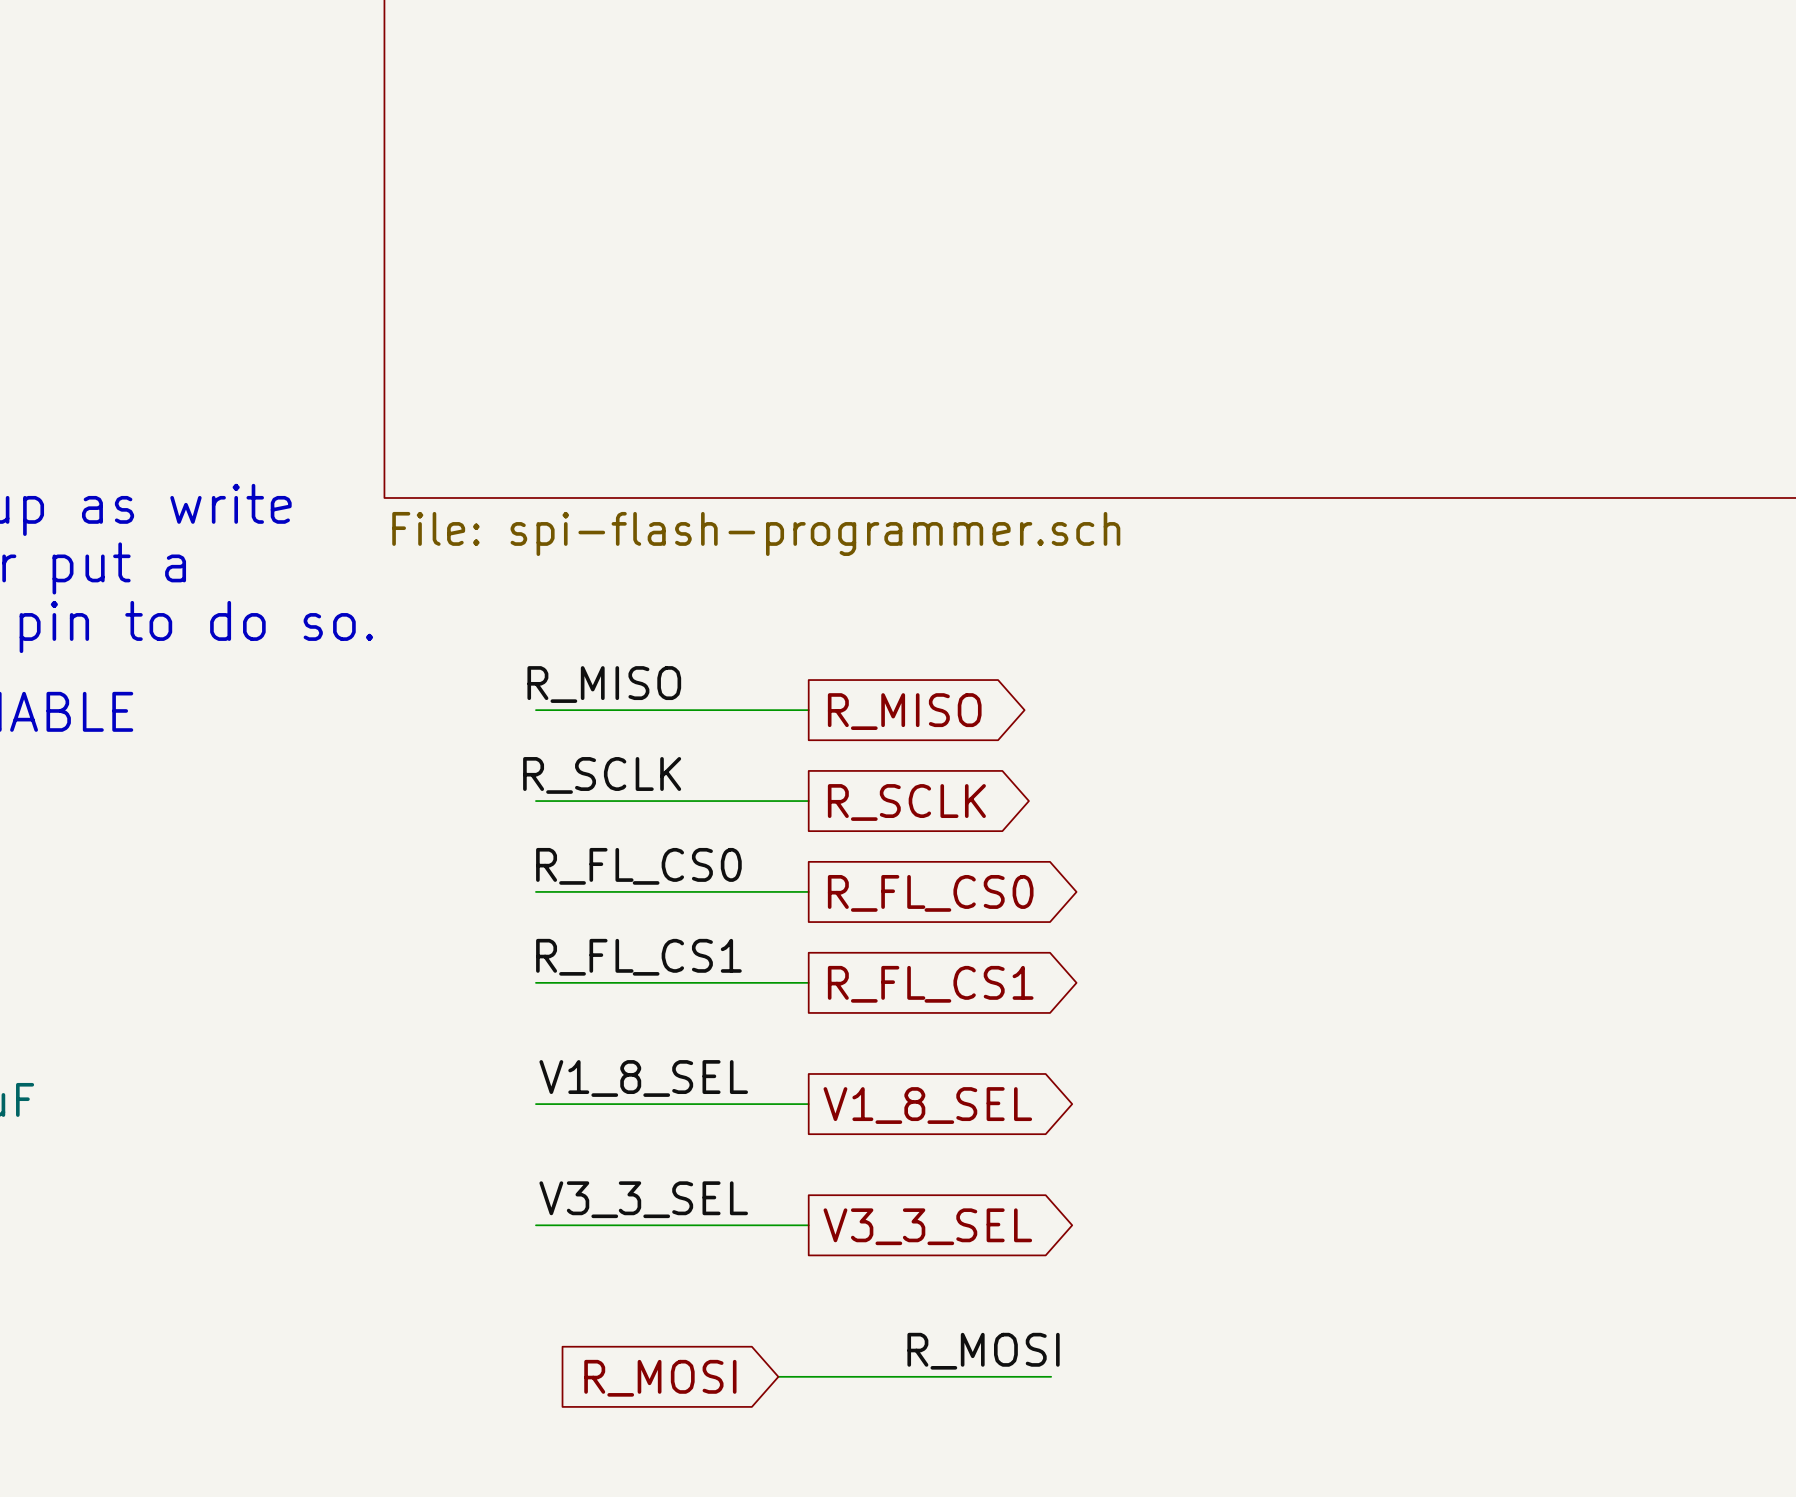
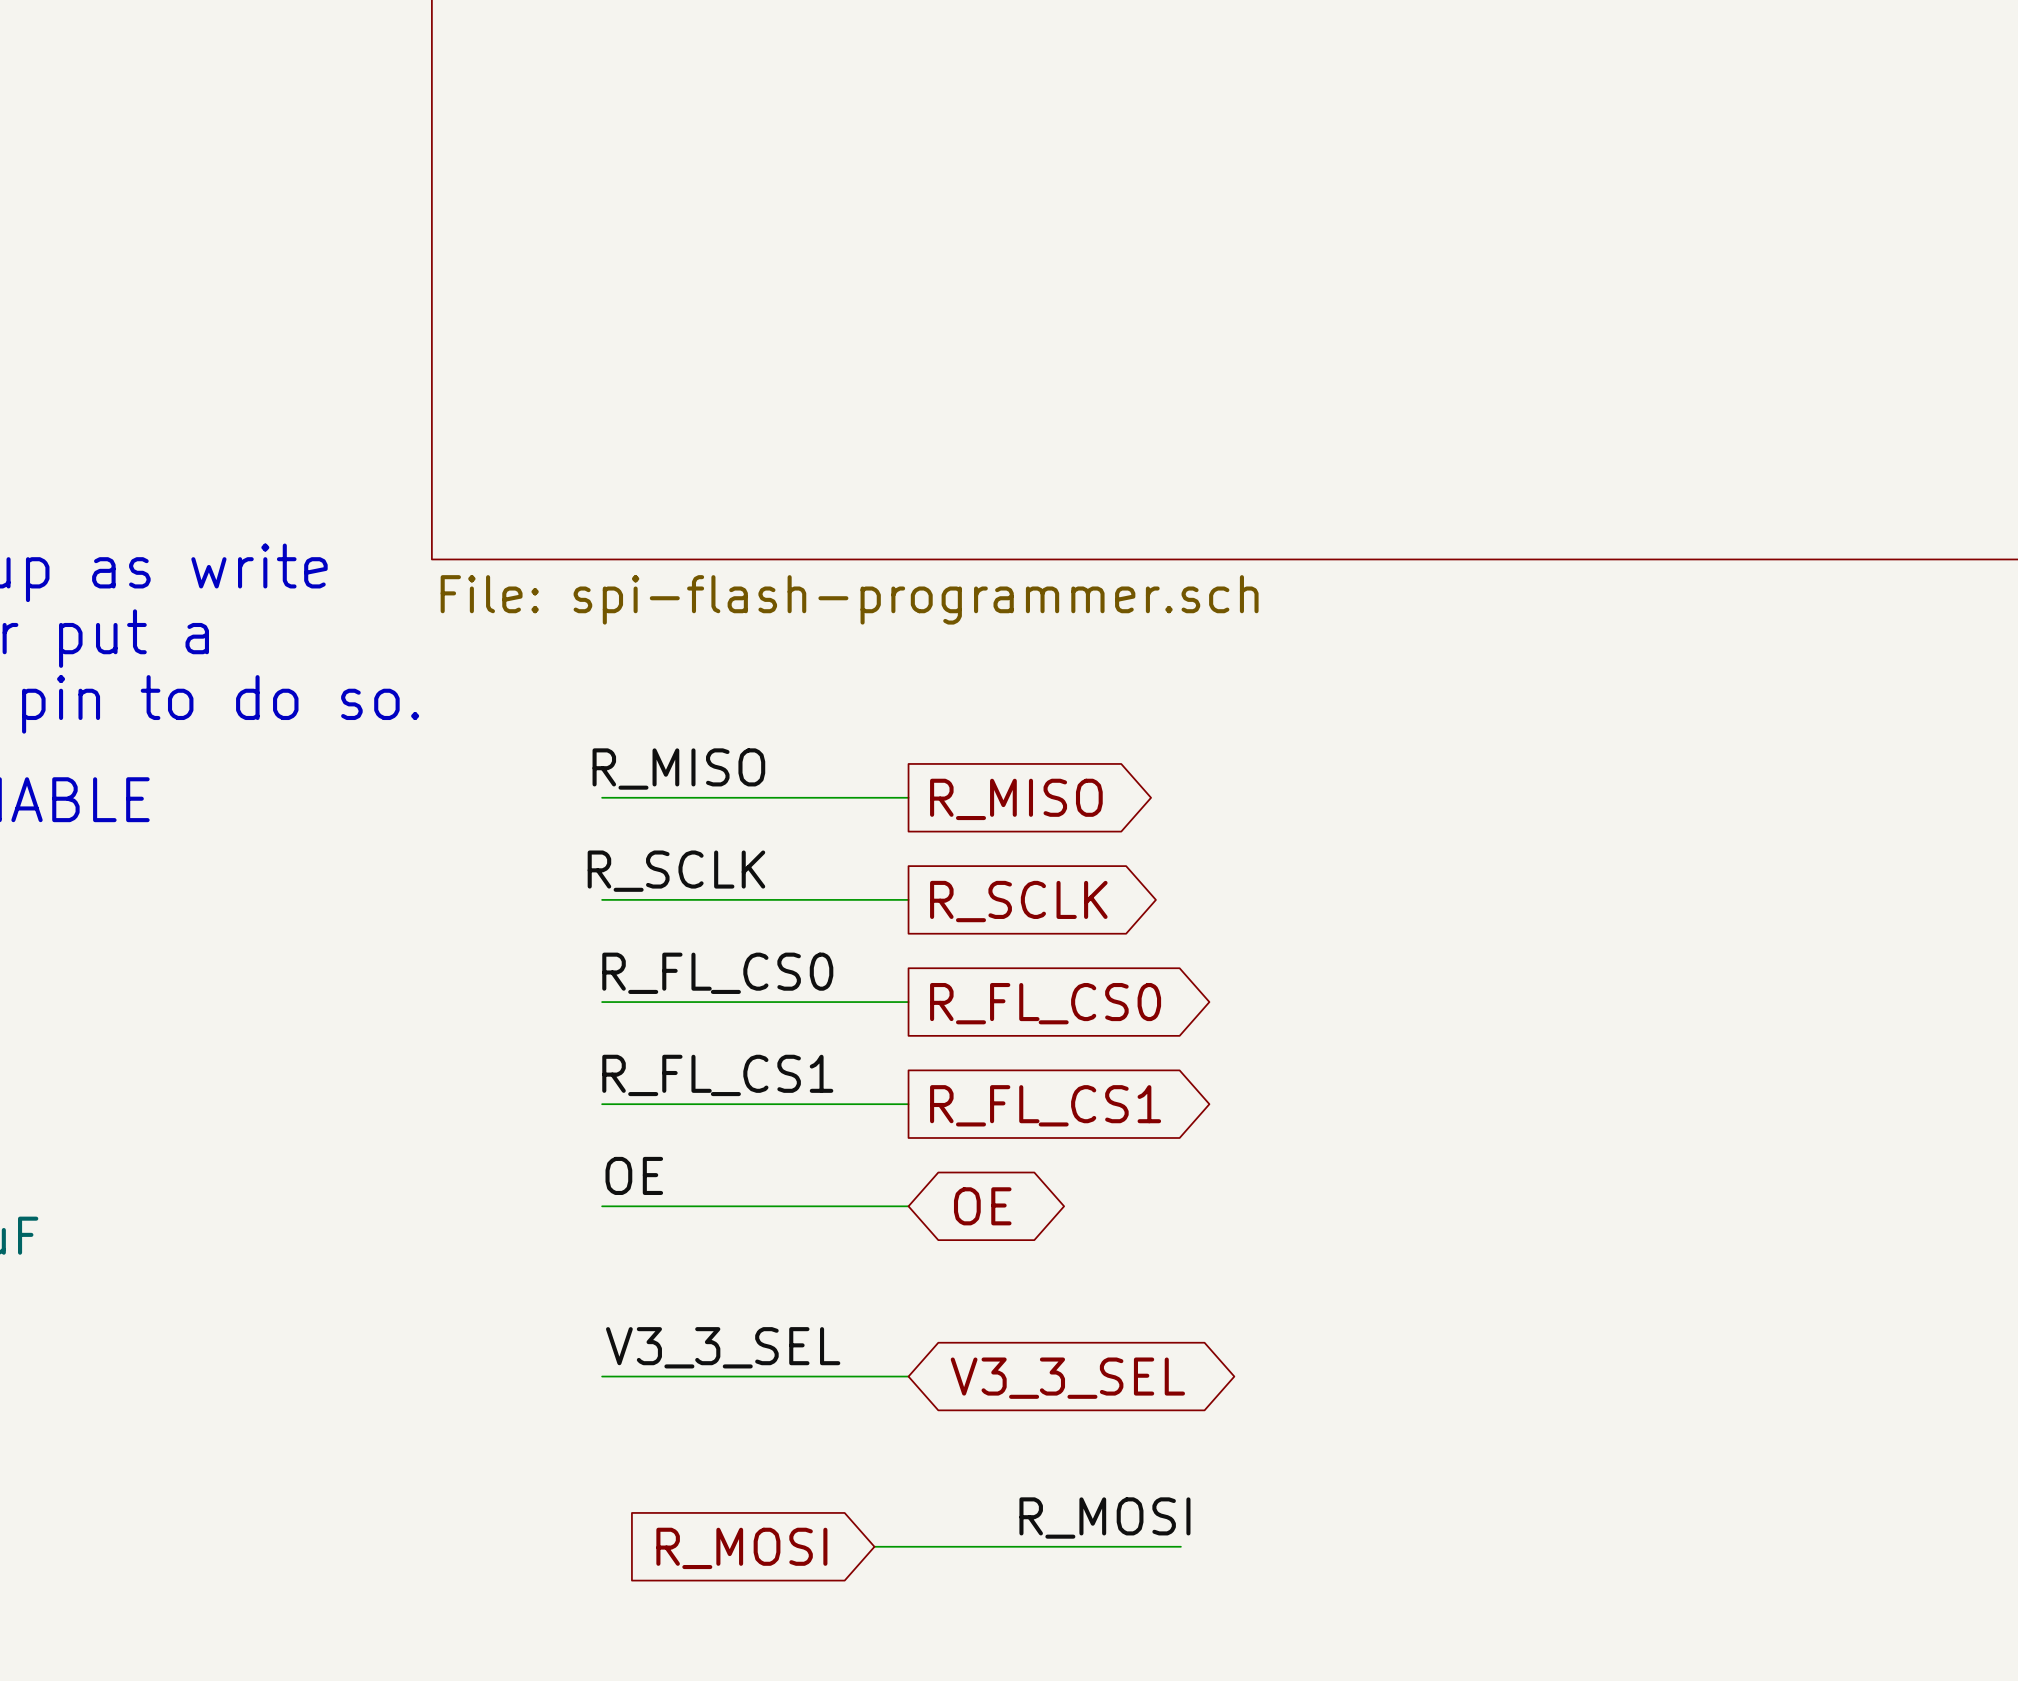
label: none -> OE (634, 1175)
global label: none -> OE (982, 1206)
label: V1_8_SEL (643, 1078) -> none
wire: (535, 1104) (808, 1104) -> (602, 1206) (908, 1206)
global label: V1_8_SEL (927, 1105) -> none
global label shape: output (927, 1226) -> bidirectional (1067, 1378)

